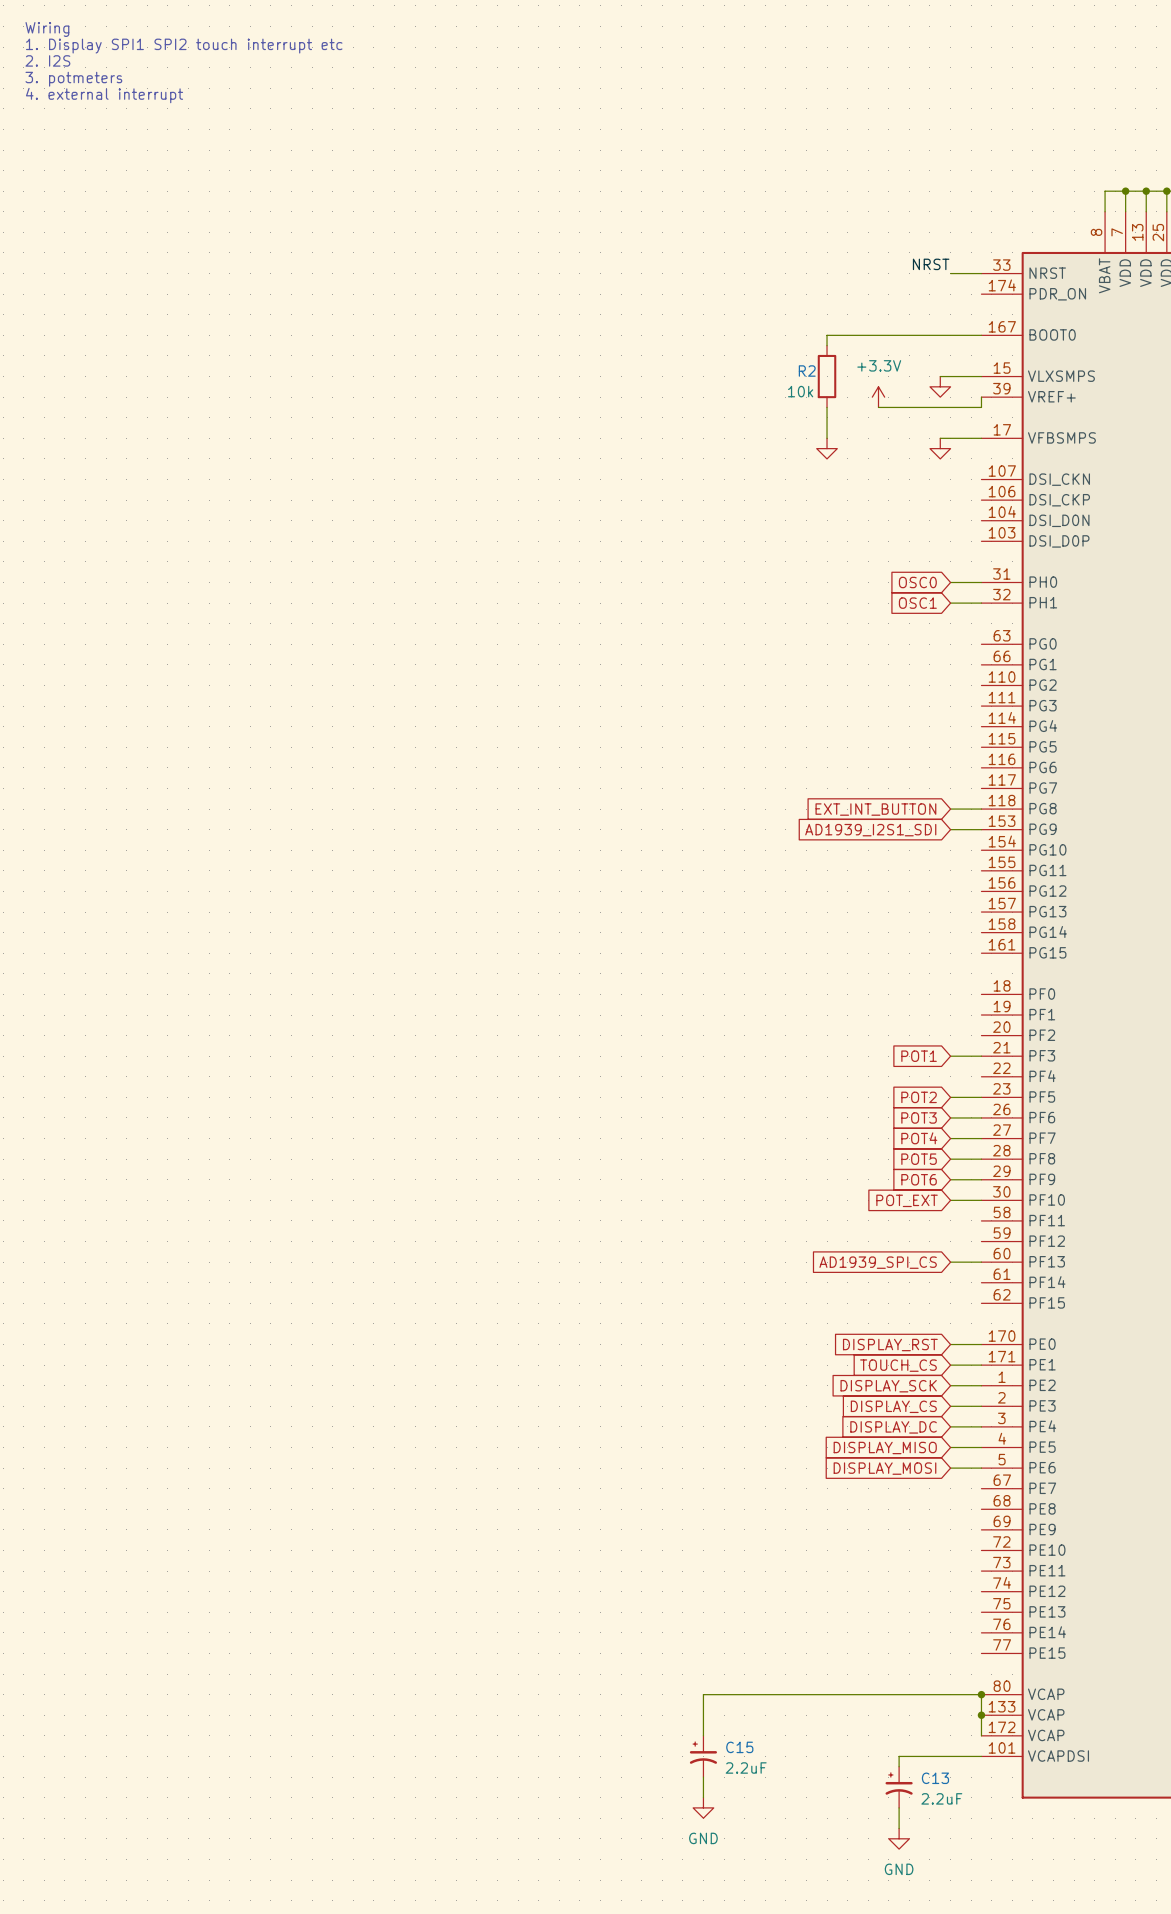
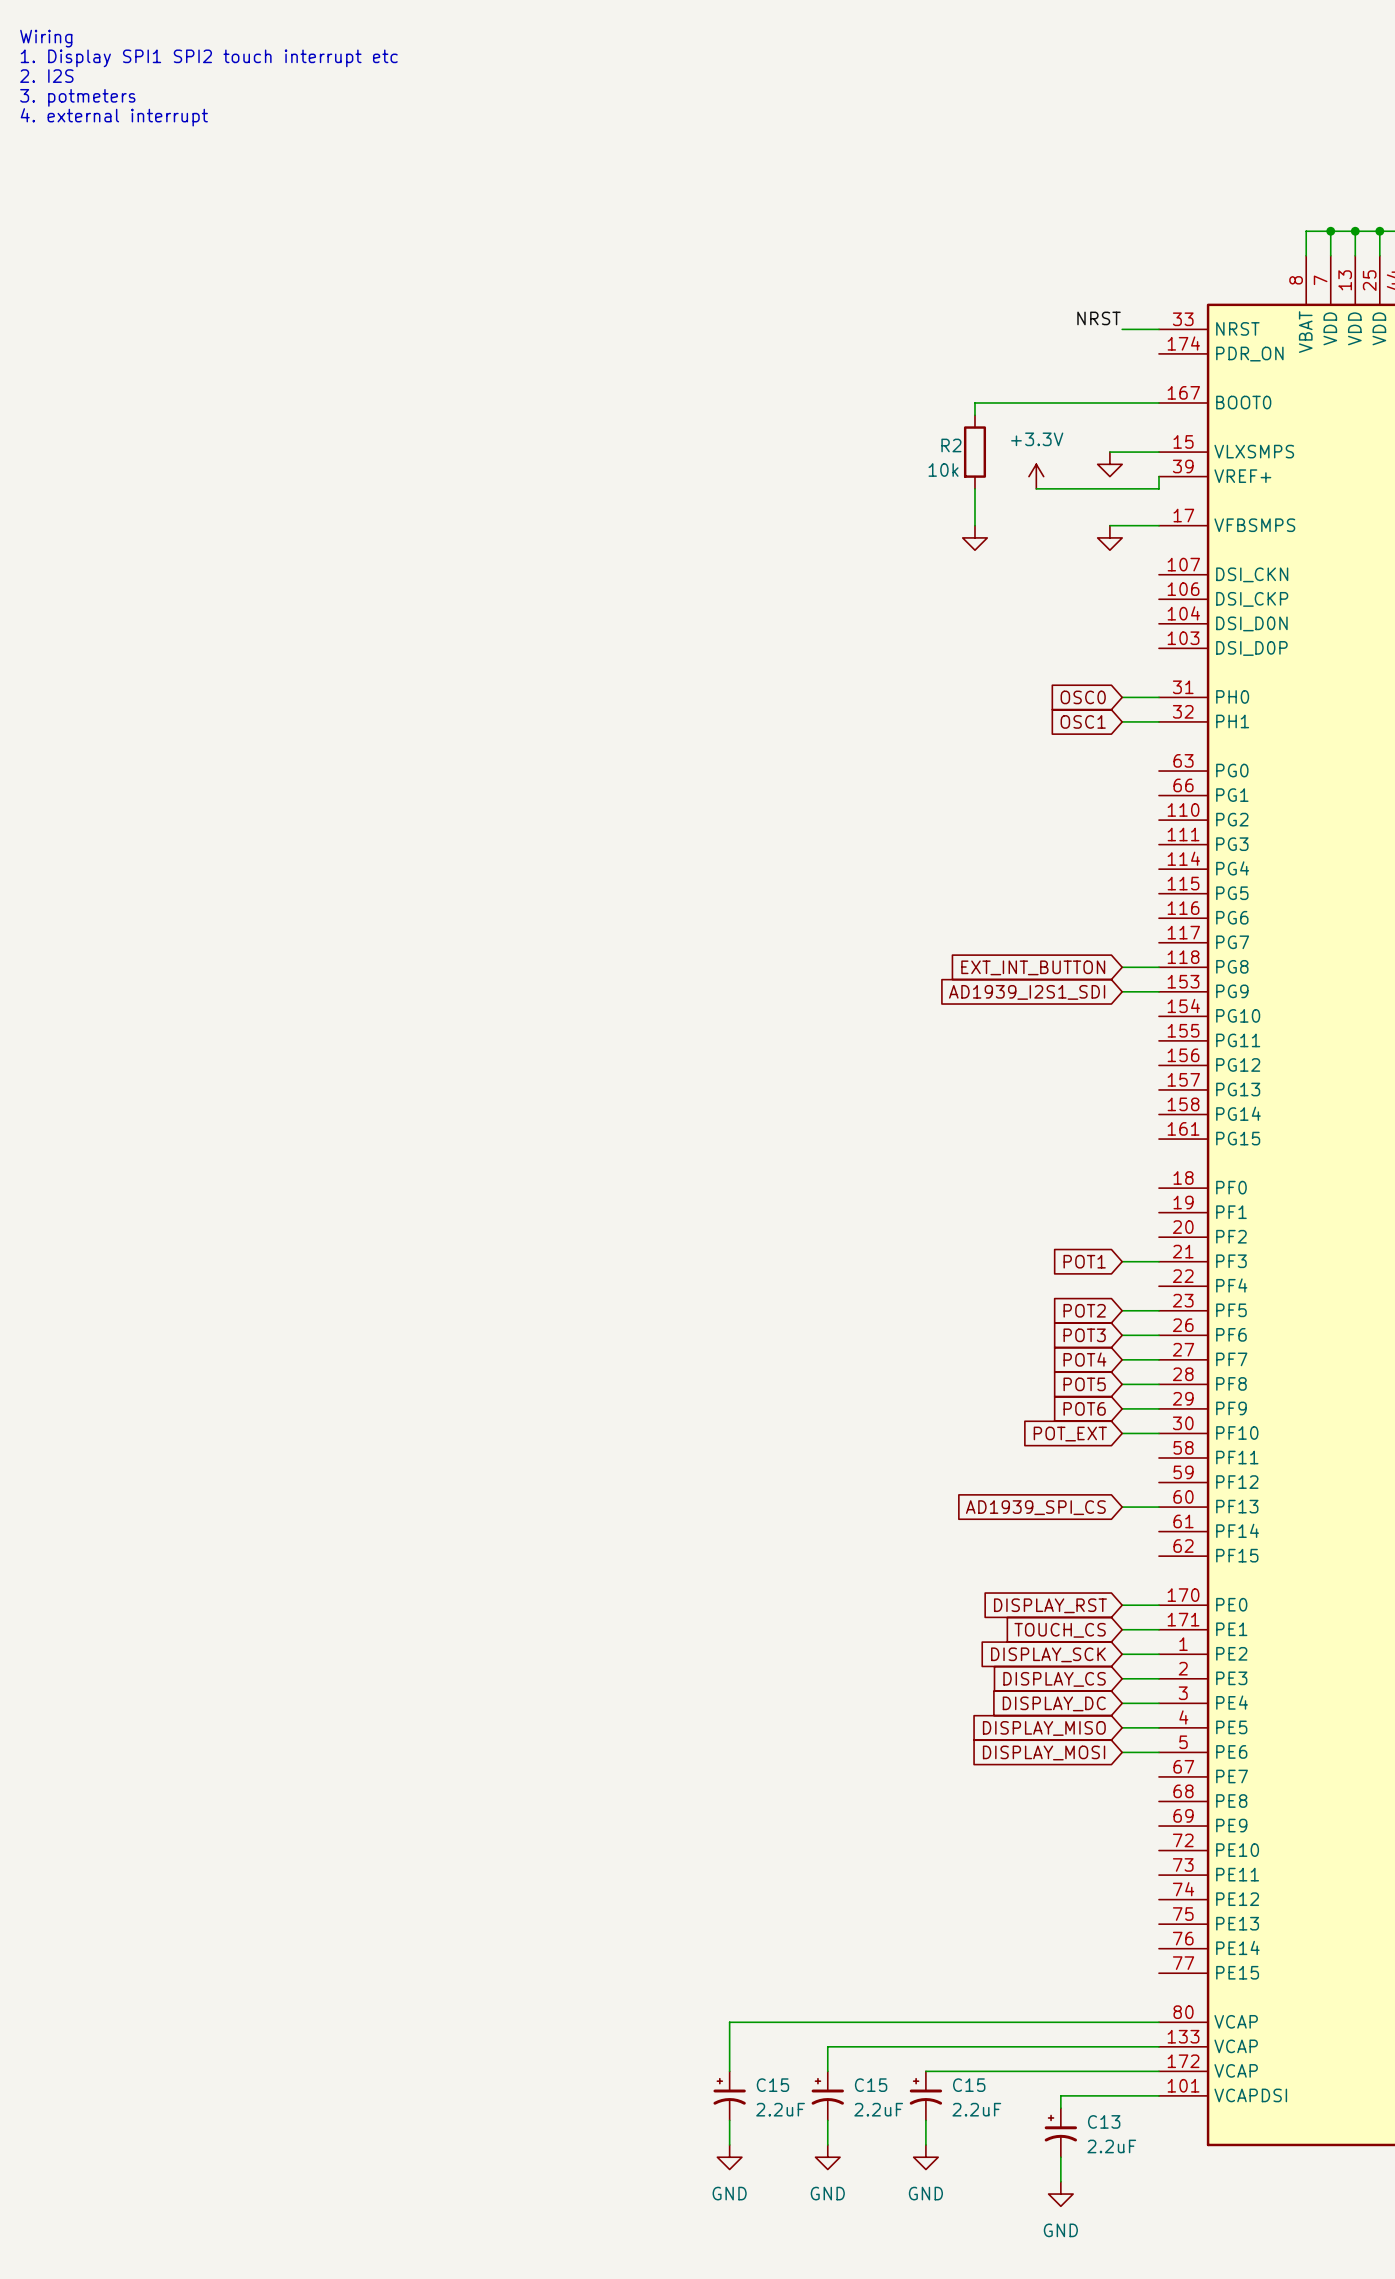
wire: (703, 1694) (703, 1715) -> (827, 2022) (729, 2022) (729, 2071)
wire: (981, 1694) (981, 1735) -> (925, 2071) (1159, 2071)
junction: (981, 1694) -> none
wire: none -> (827, 2046) (1159, 2046)
junction: (981, 1715) -> none
C15: none -> 2.2uF (729, 2095)
C15: none -> 2.2uF (925, 2095)
wire: none -> (729, 2120) (729, 2144)
wire: none -> (925, 2120) (925, 2144)
power symbol: none -> GND (729, 2157)
power symbol: none -> GND (925, 2157)

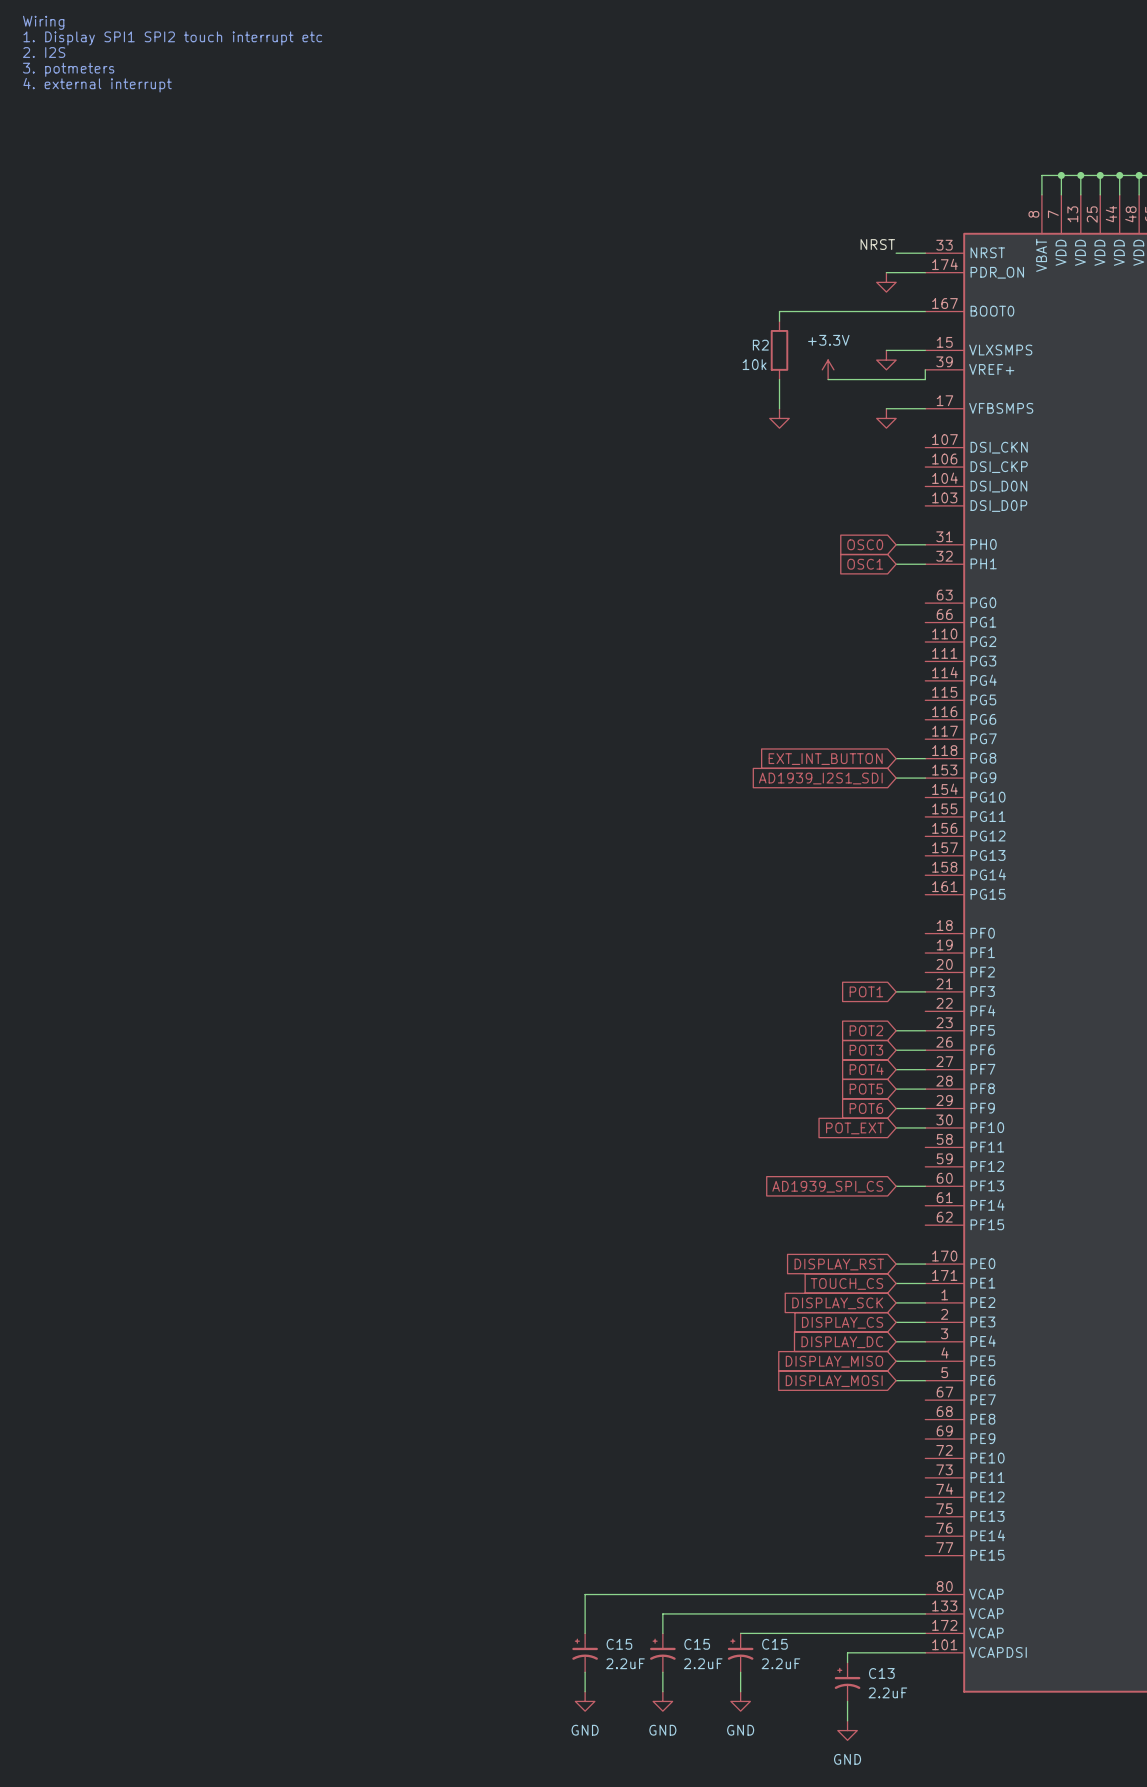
wire: none -> (886, 272) (925, 272)
power symbol: none -> (886, 282)

